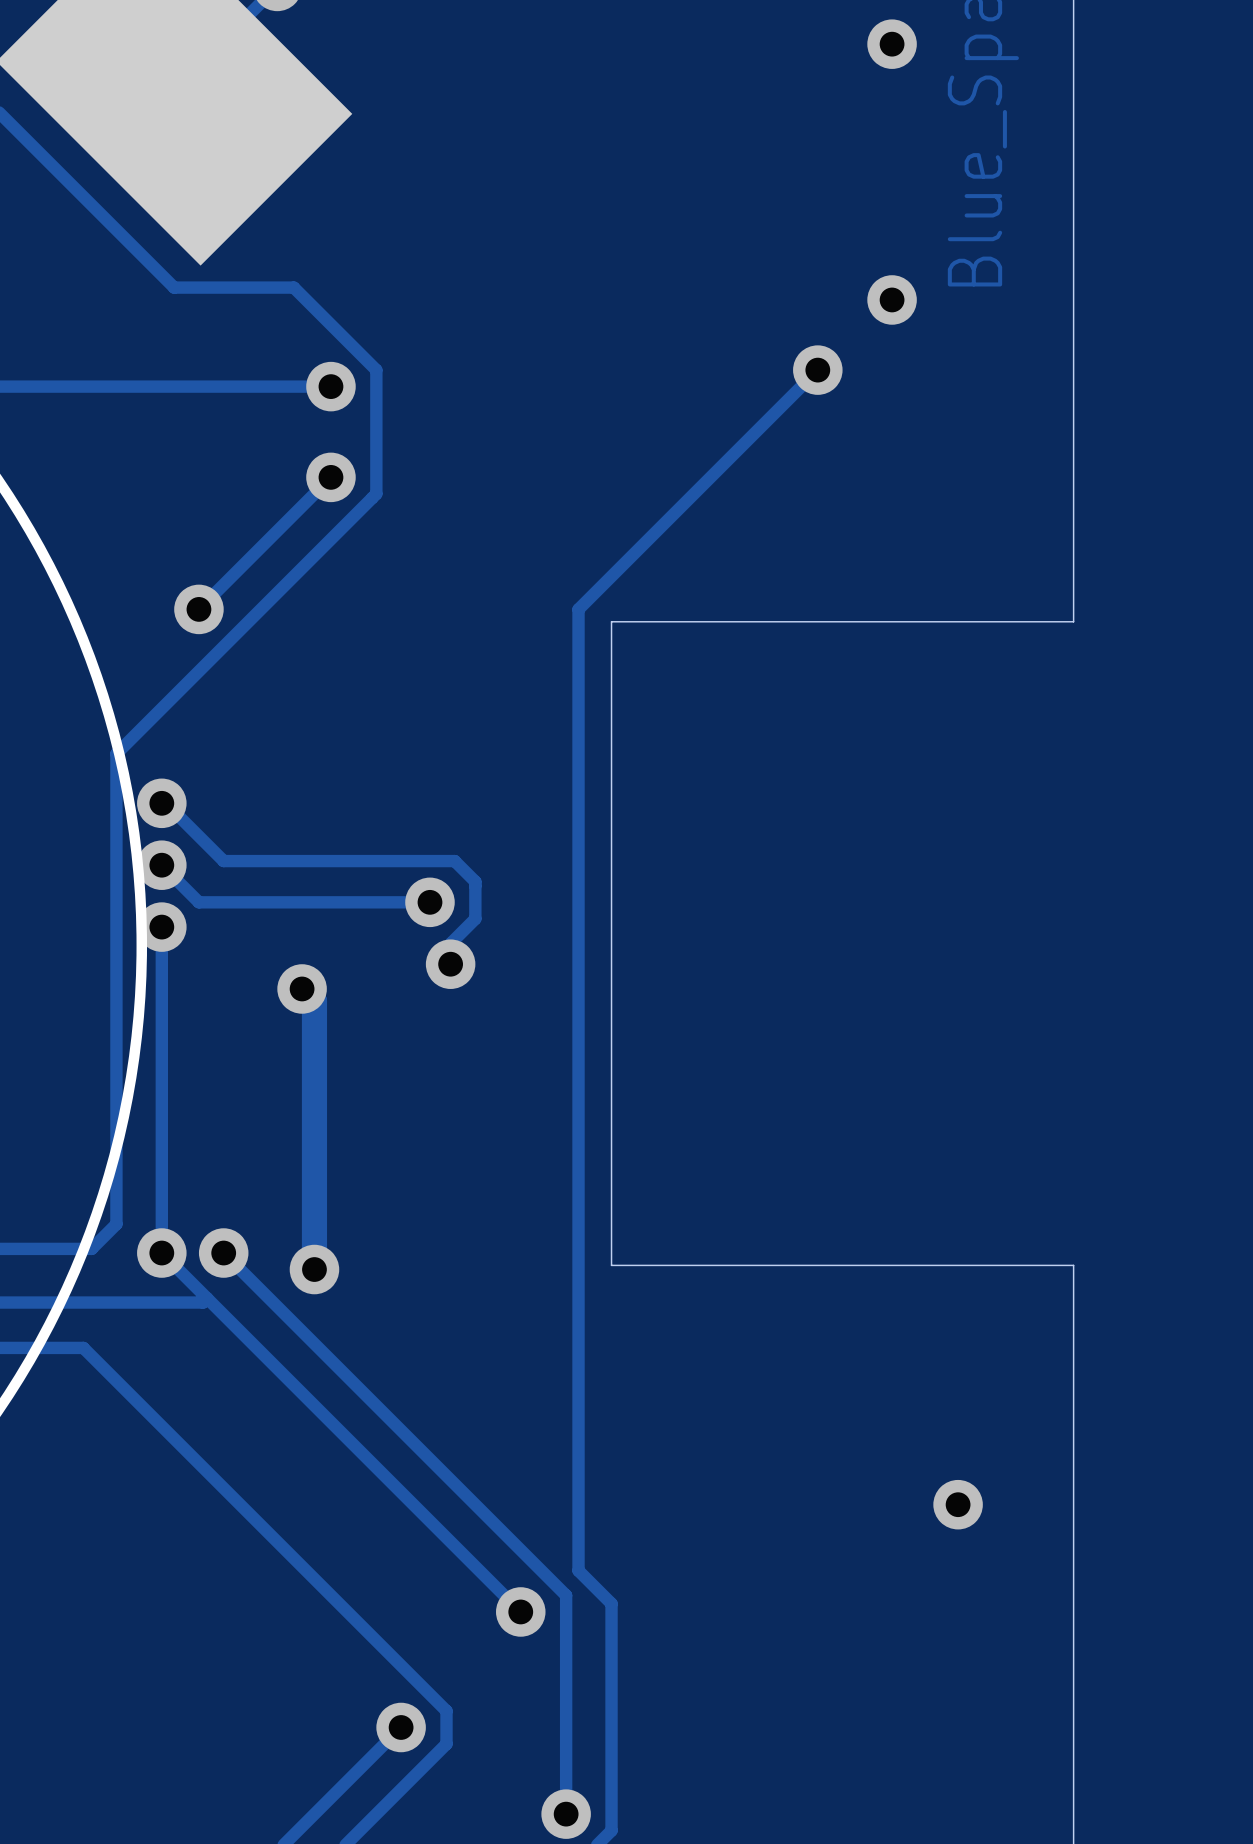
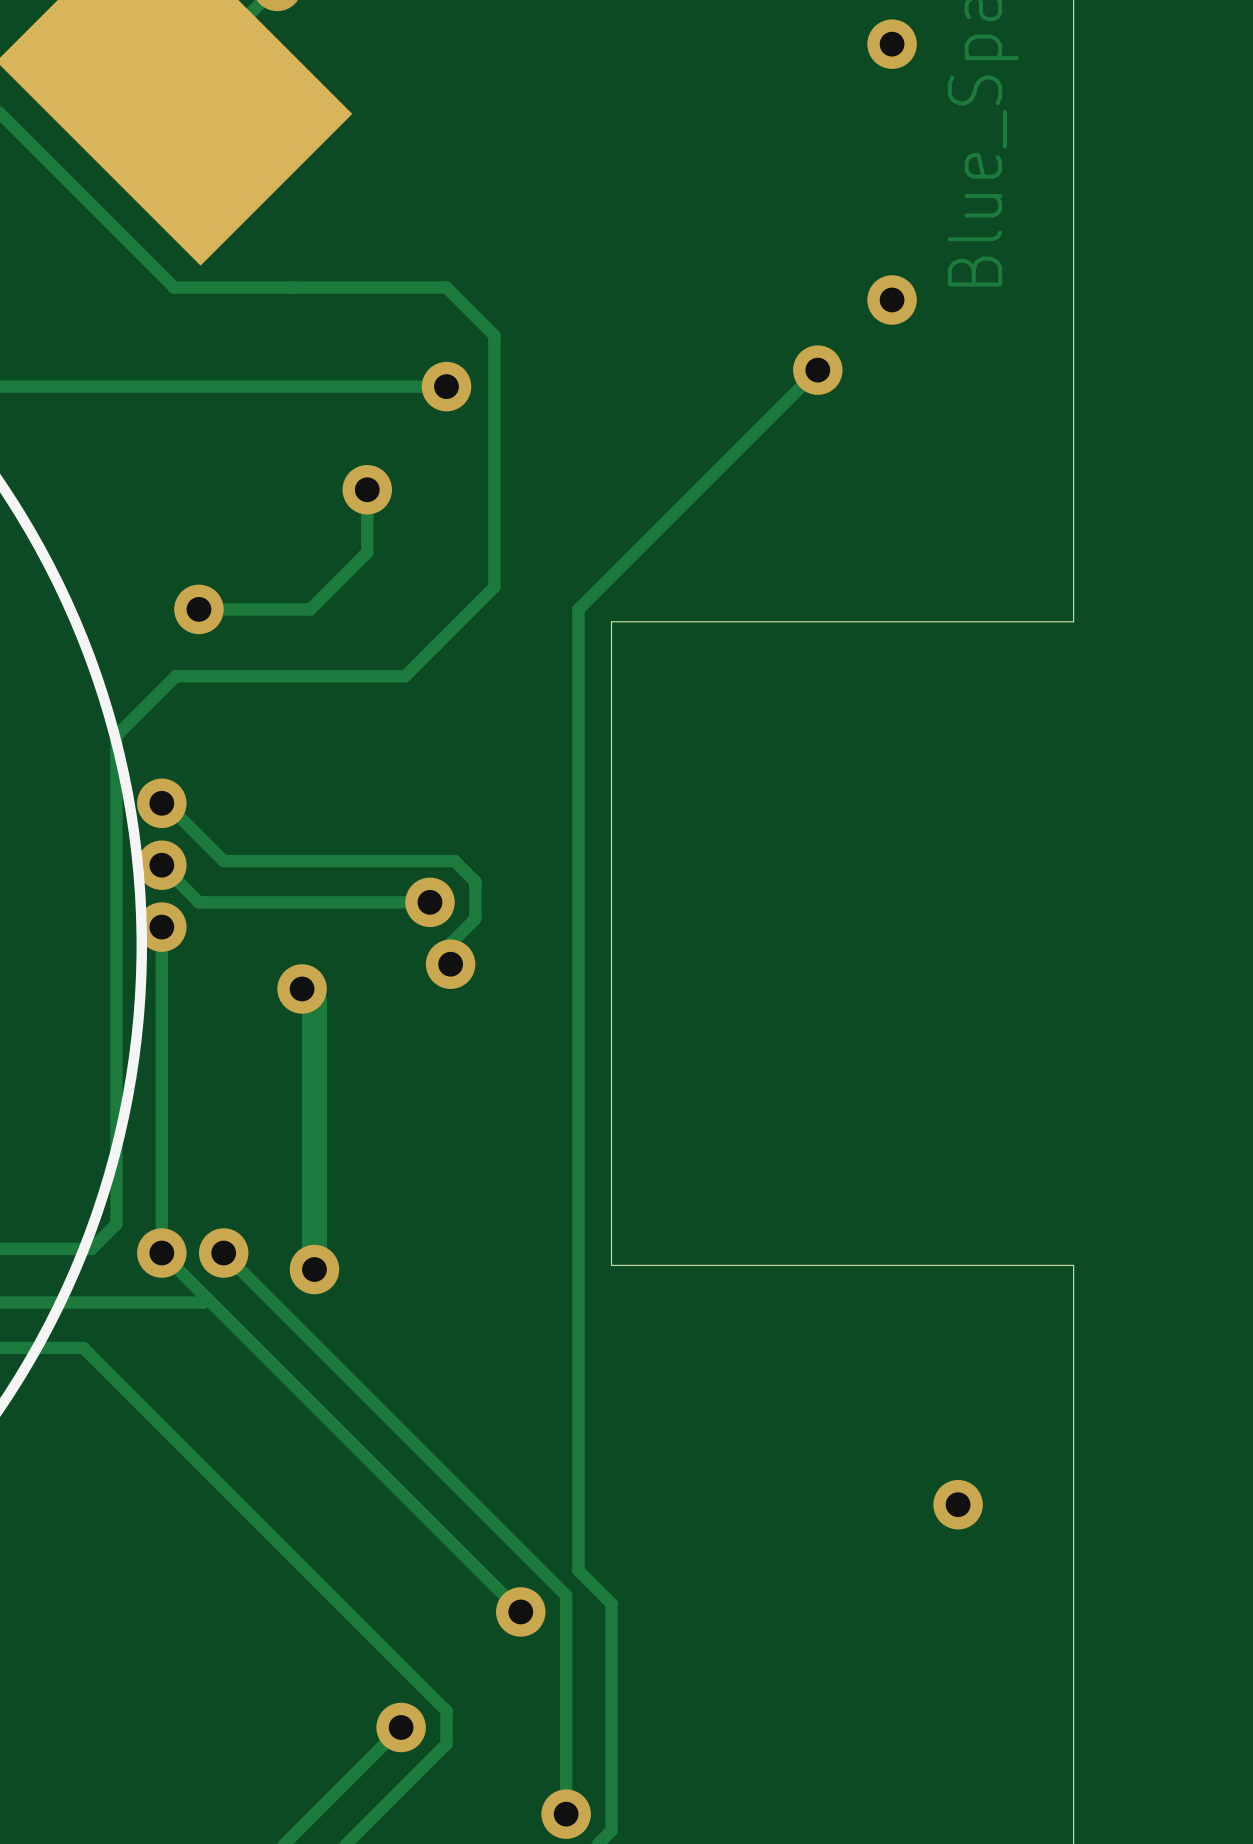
track: (293, 287) (376, 370) (376, 493) (116, 753) -> (293, 287) (446, 287) (494, 335) (494, 587) (405, 676) (175, 676) (116, 735) (116, 753)
via: (330, 386) -> none
track: none -> (446, 386) (330, 386)
via: none -> (446, 386)
track: (330, 477) (198, 609) -> (367, 489) (367, 552) (310, 609) (198, 609)
via position: (330, 477) -> (367, 489)

